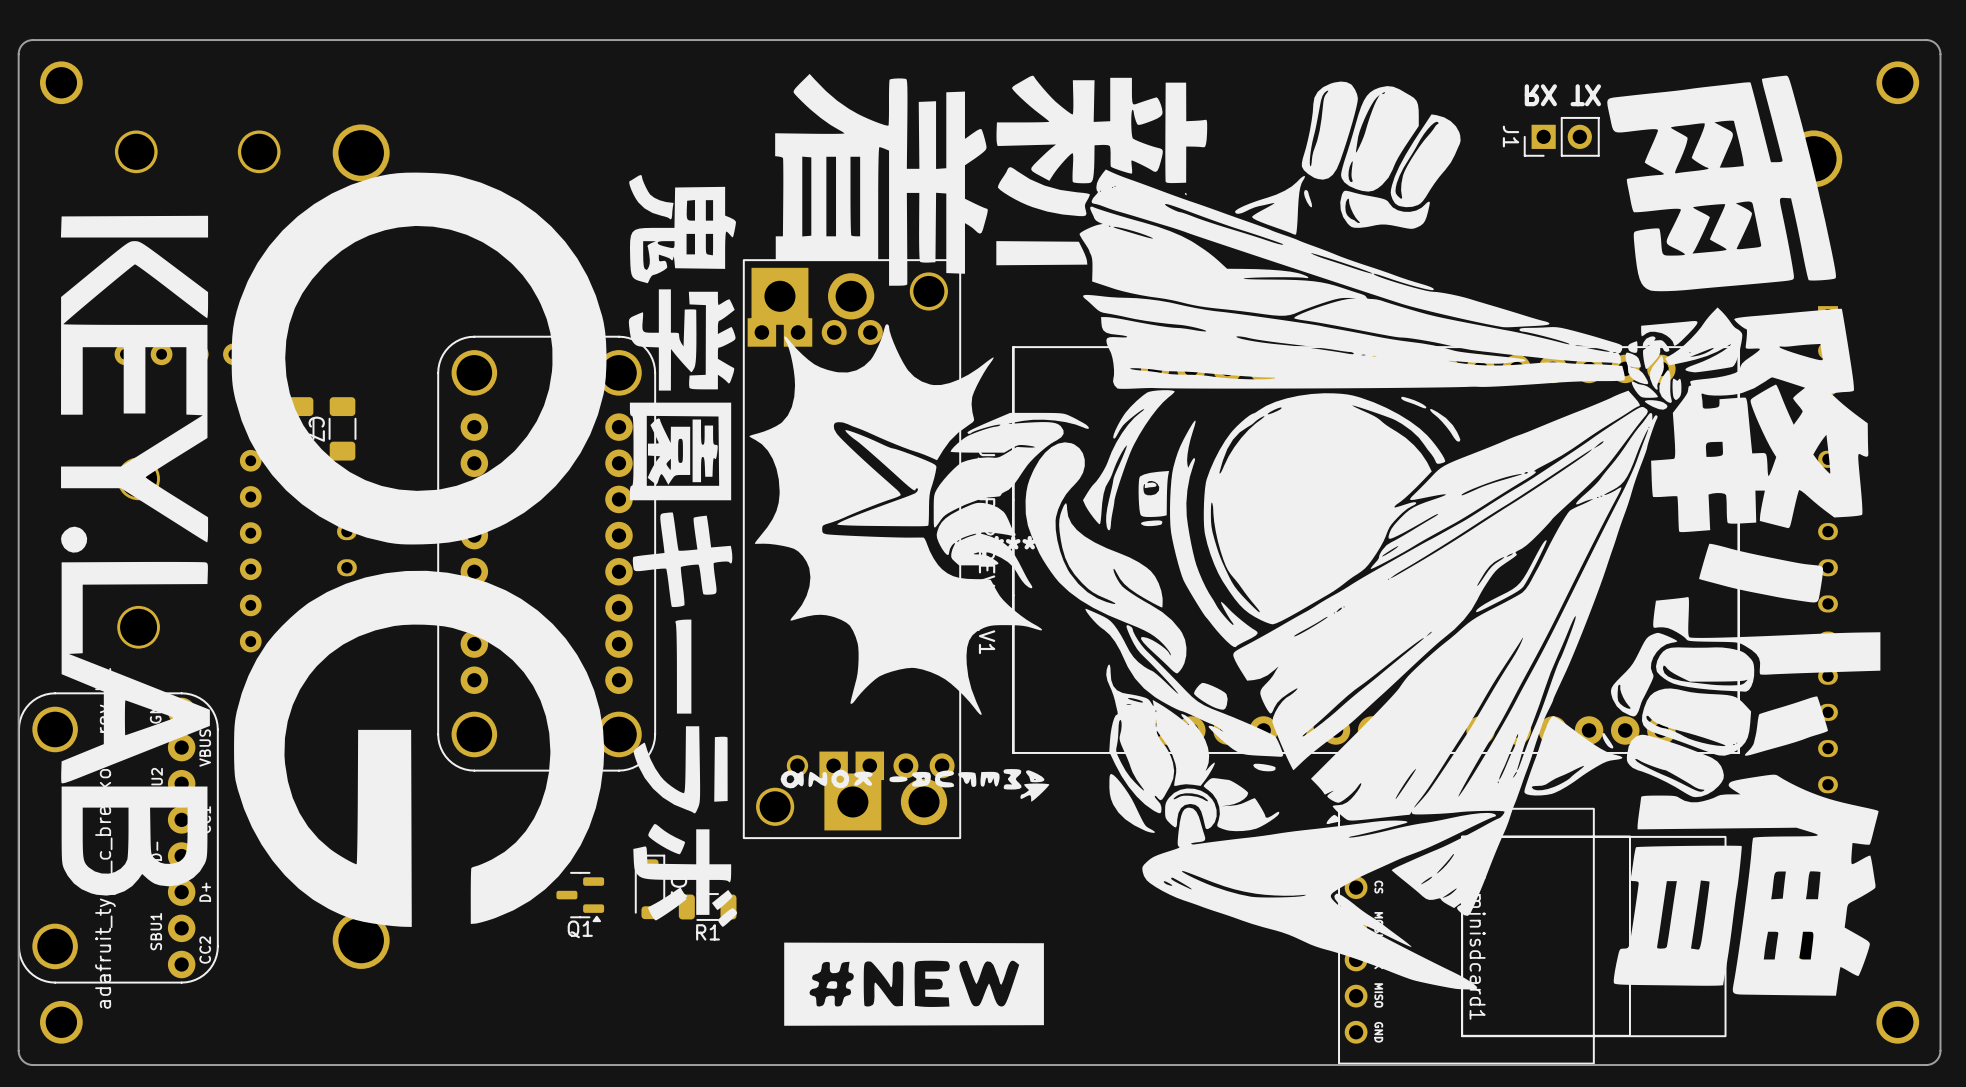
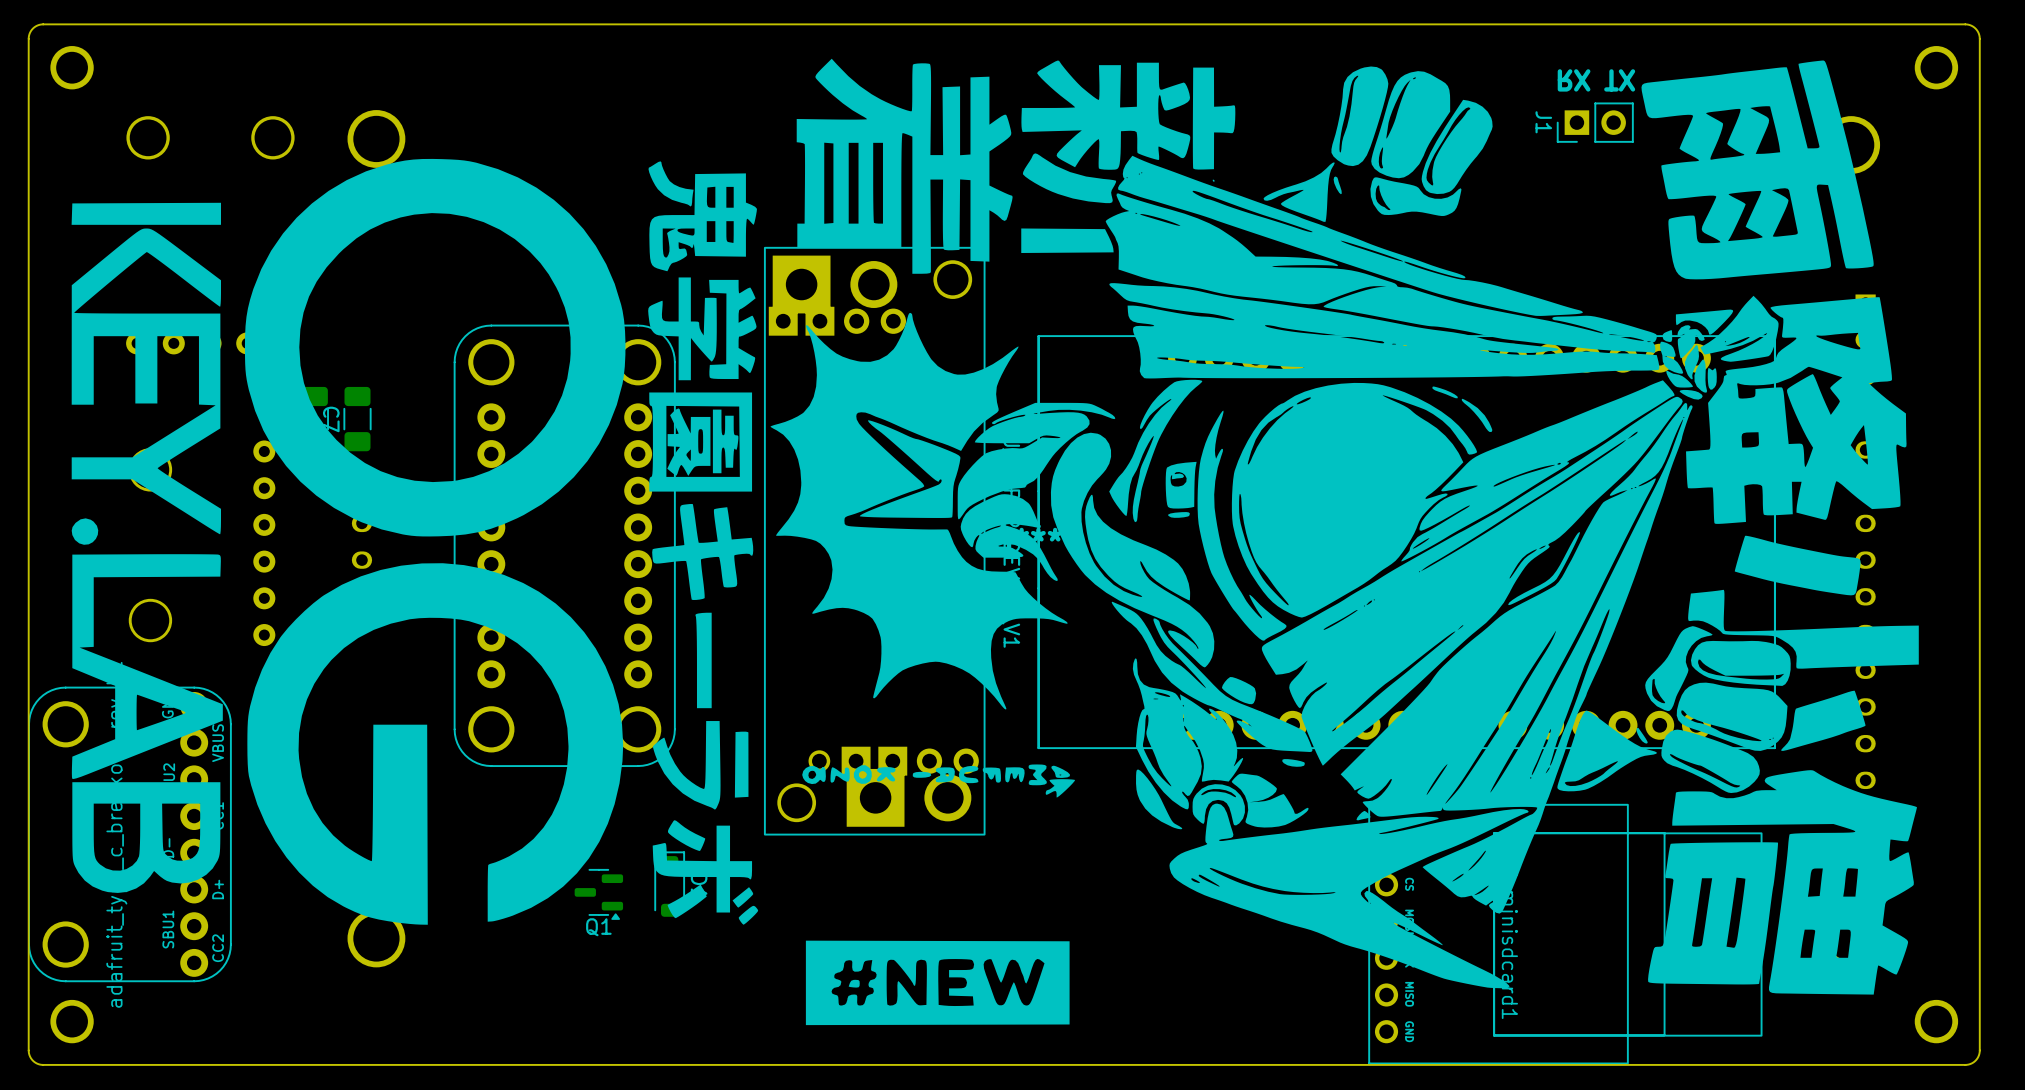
R1: (707, 907) -> none

